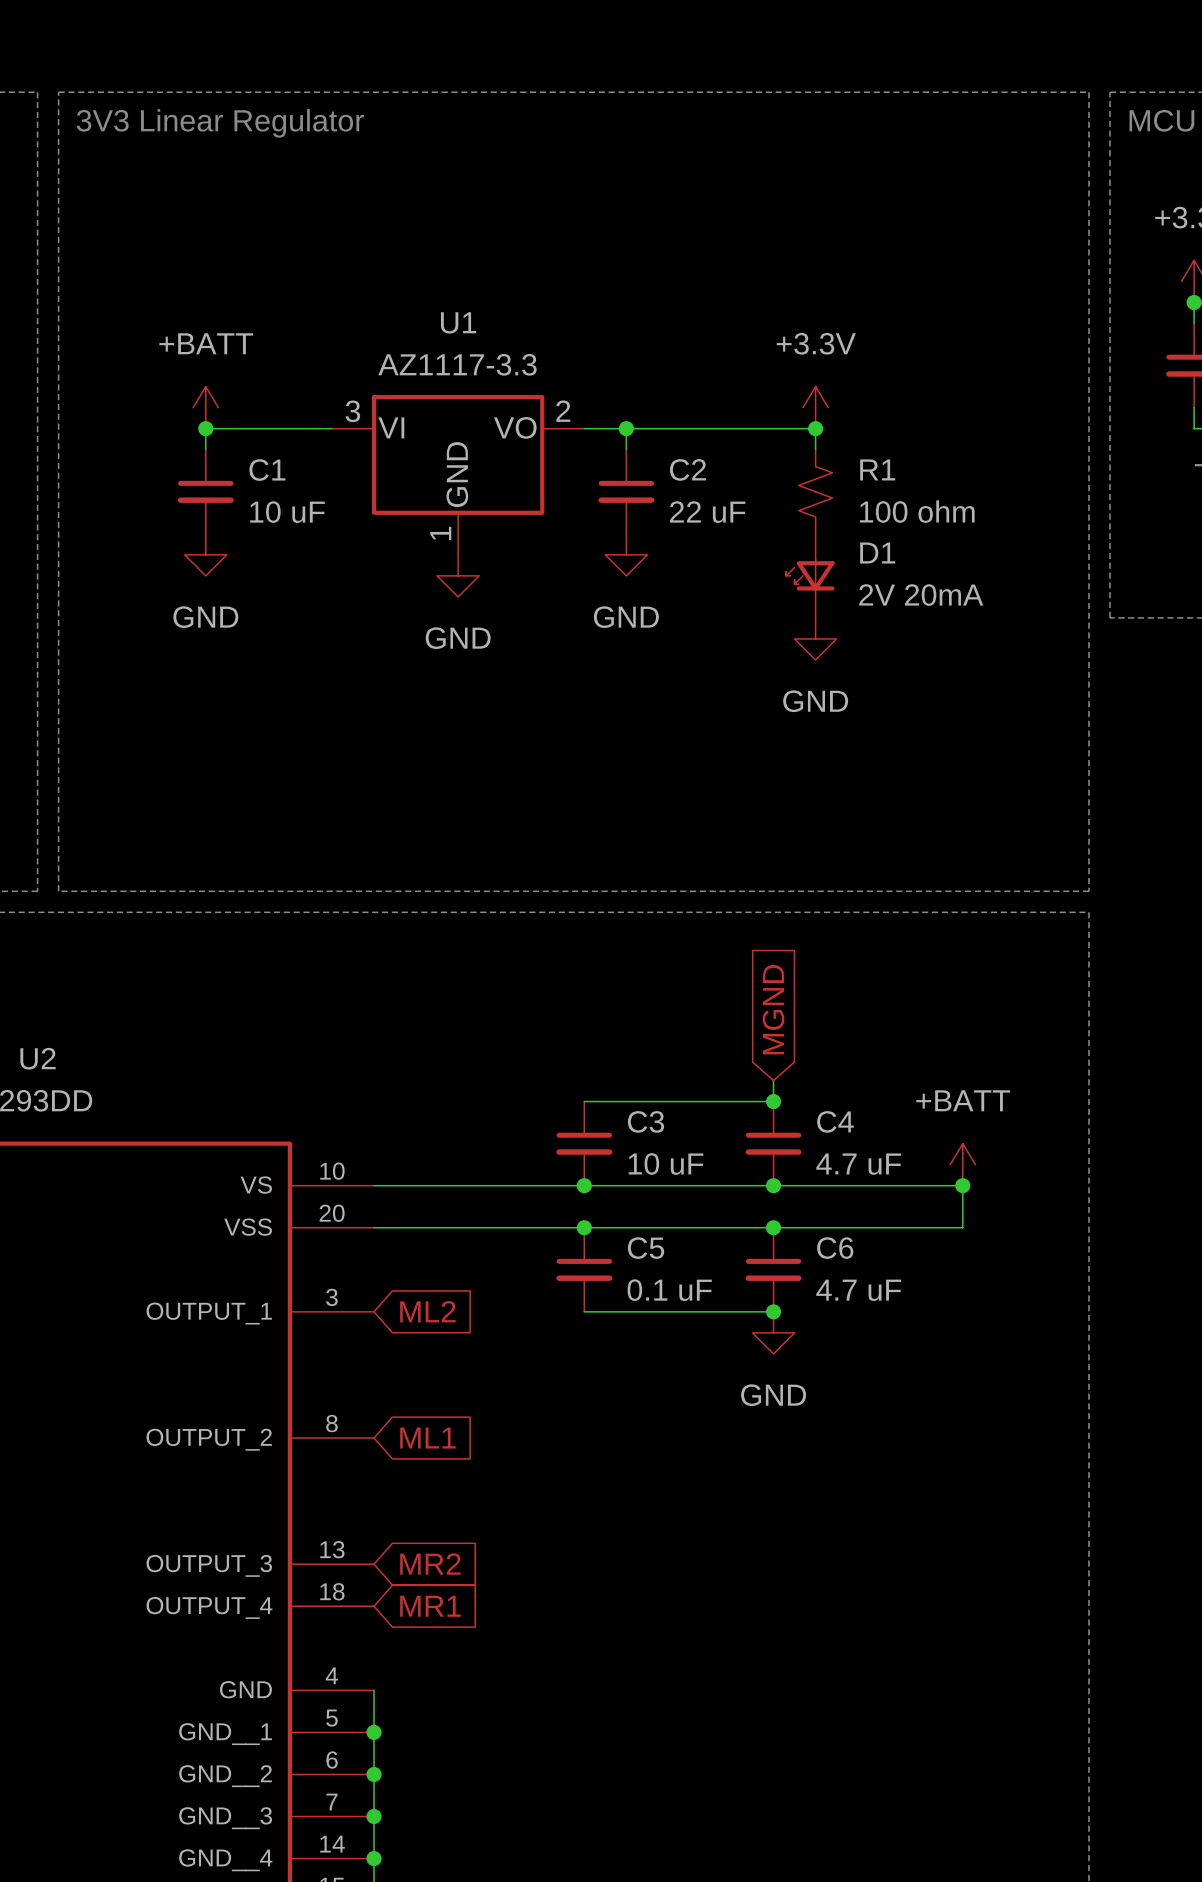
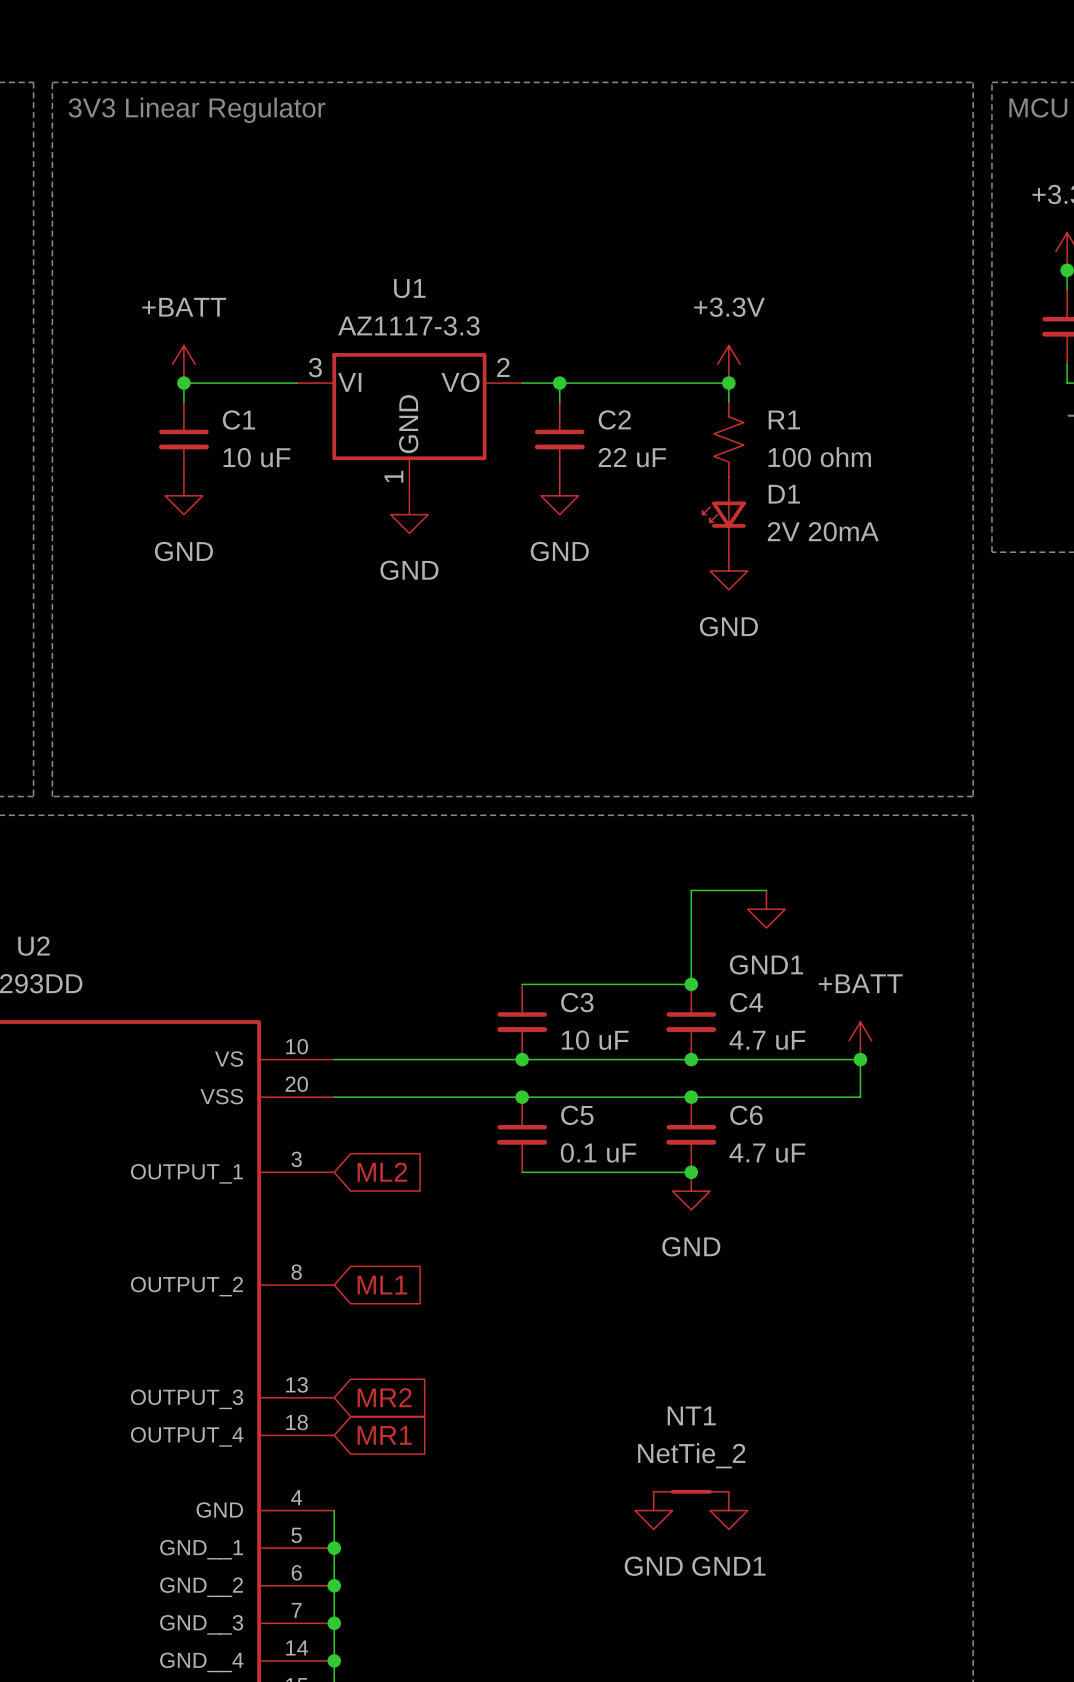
wire: none -> (766, 890) (691, 890) (691, 965)
global label: MGND (773, 1009) -> none
power symbol: none -> GND1 (766, 909)
NT1: none -> NetTie_2 (691, 1491)
power symbol: none -> GND (653, 1510)
power symbol: none -> GND1 (728, 1510)

